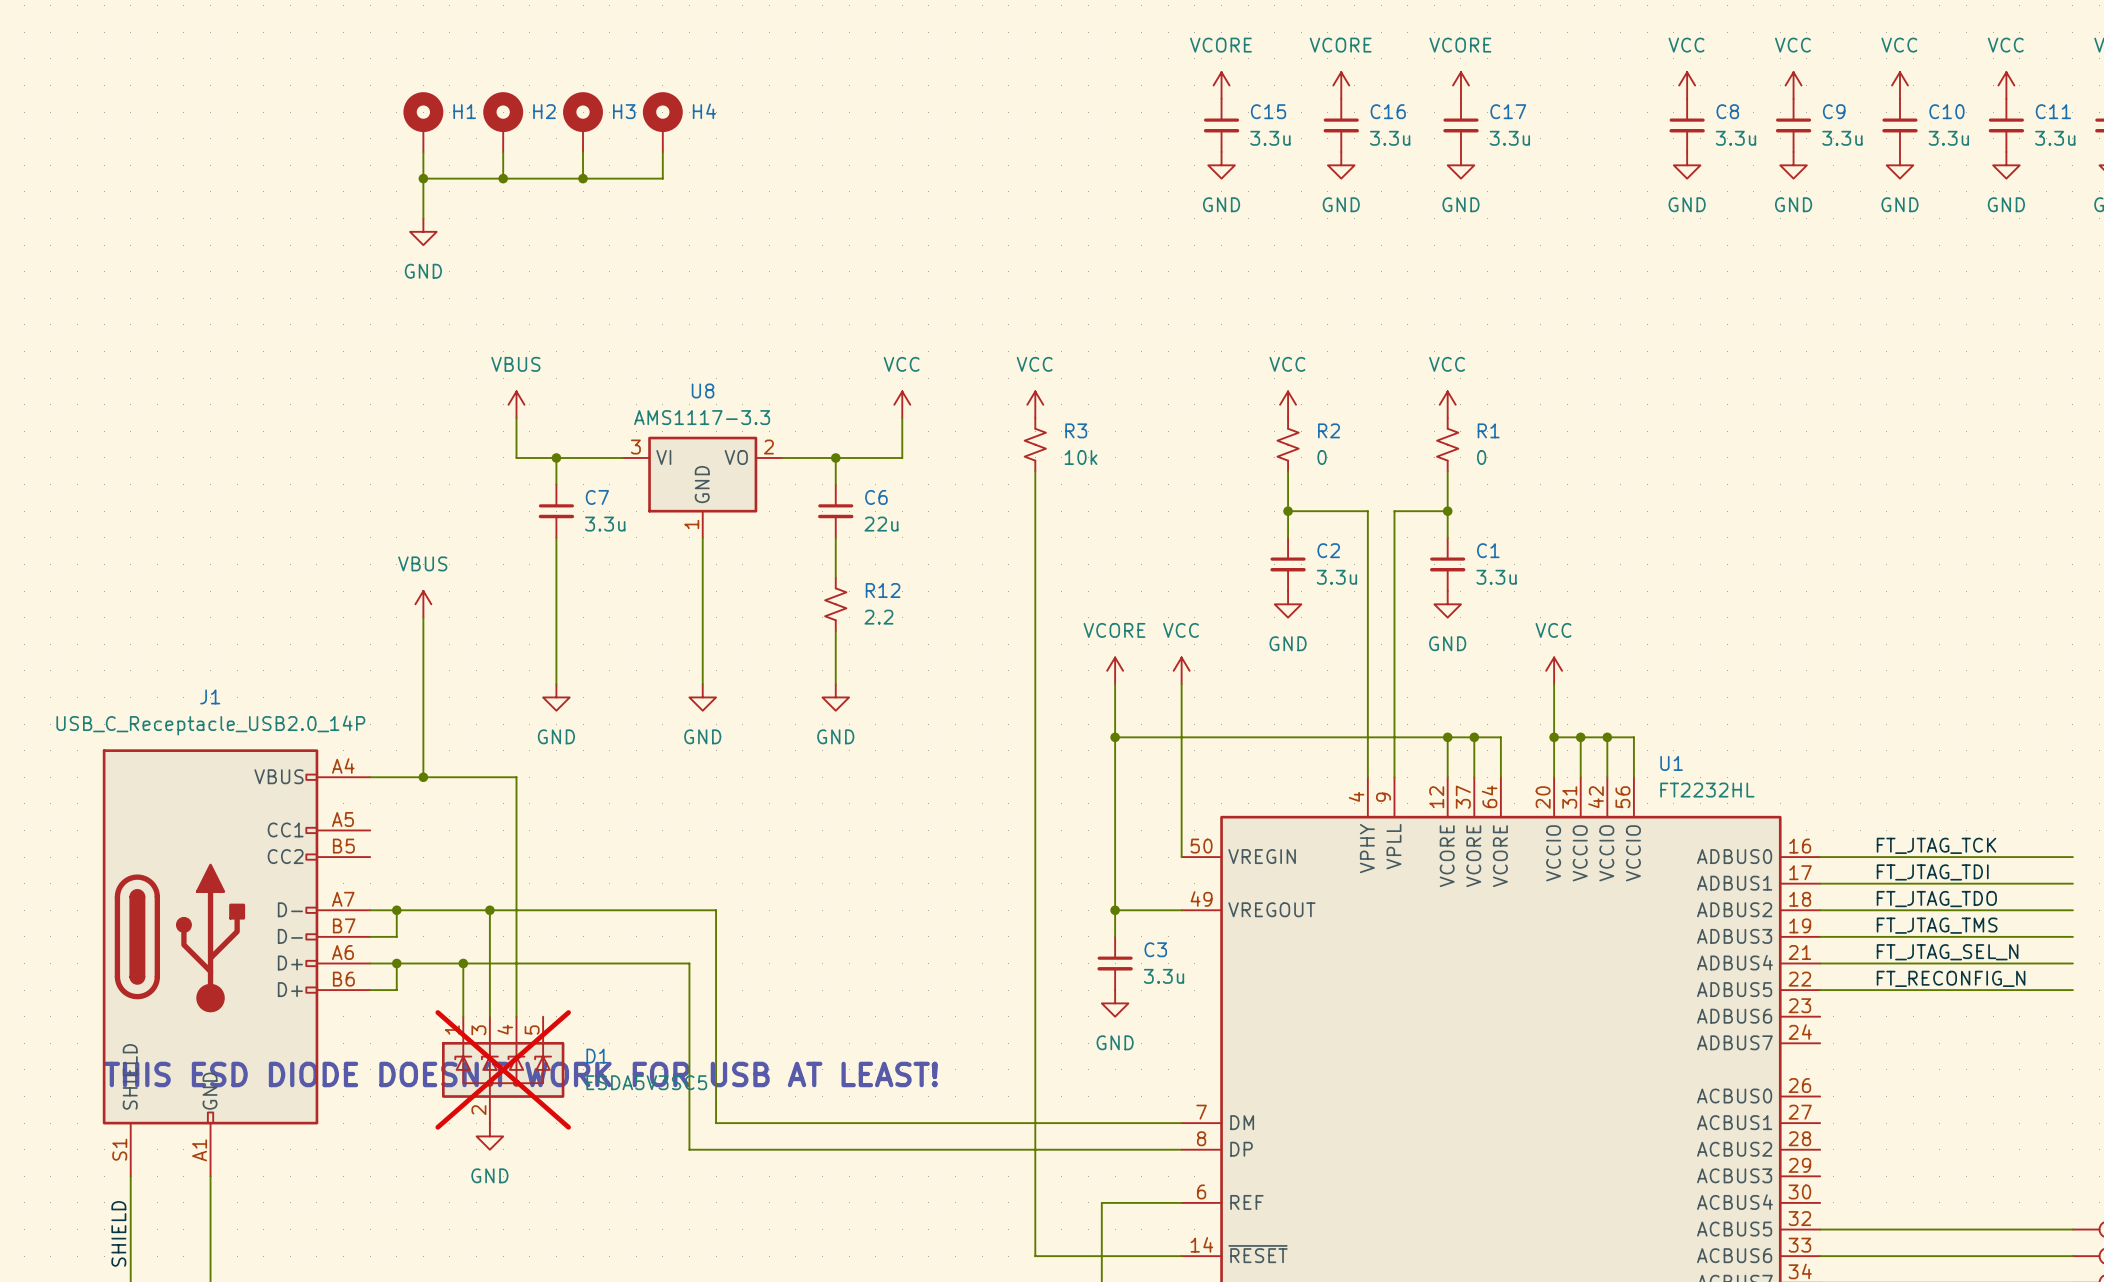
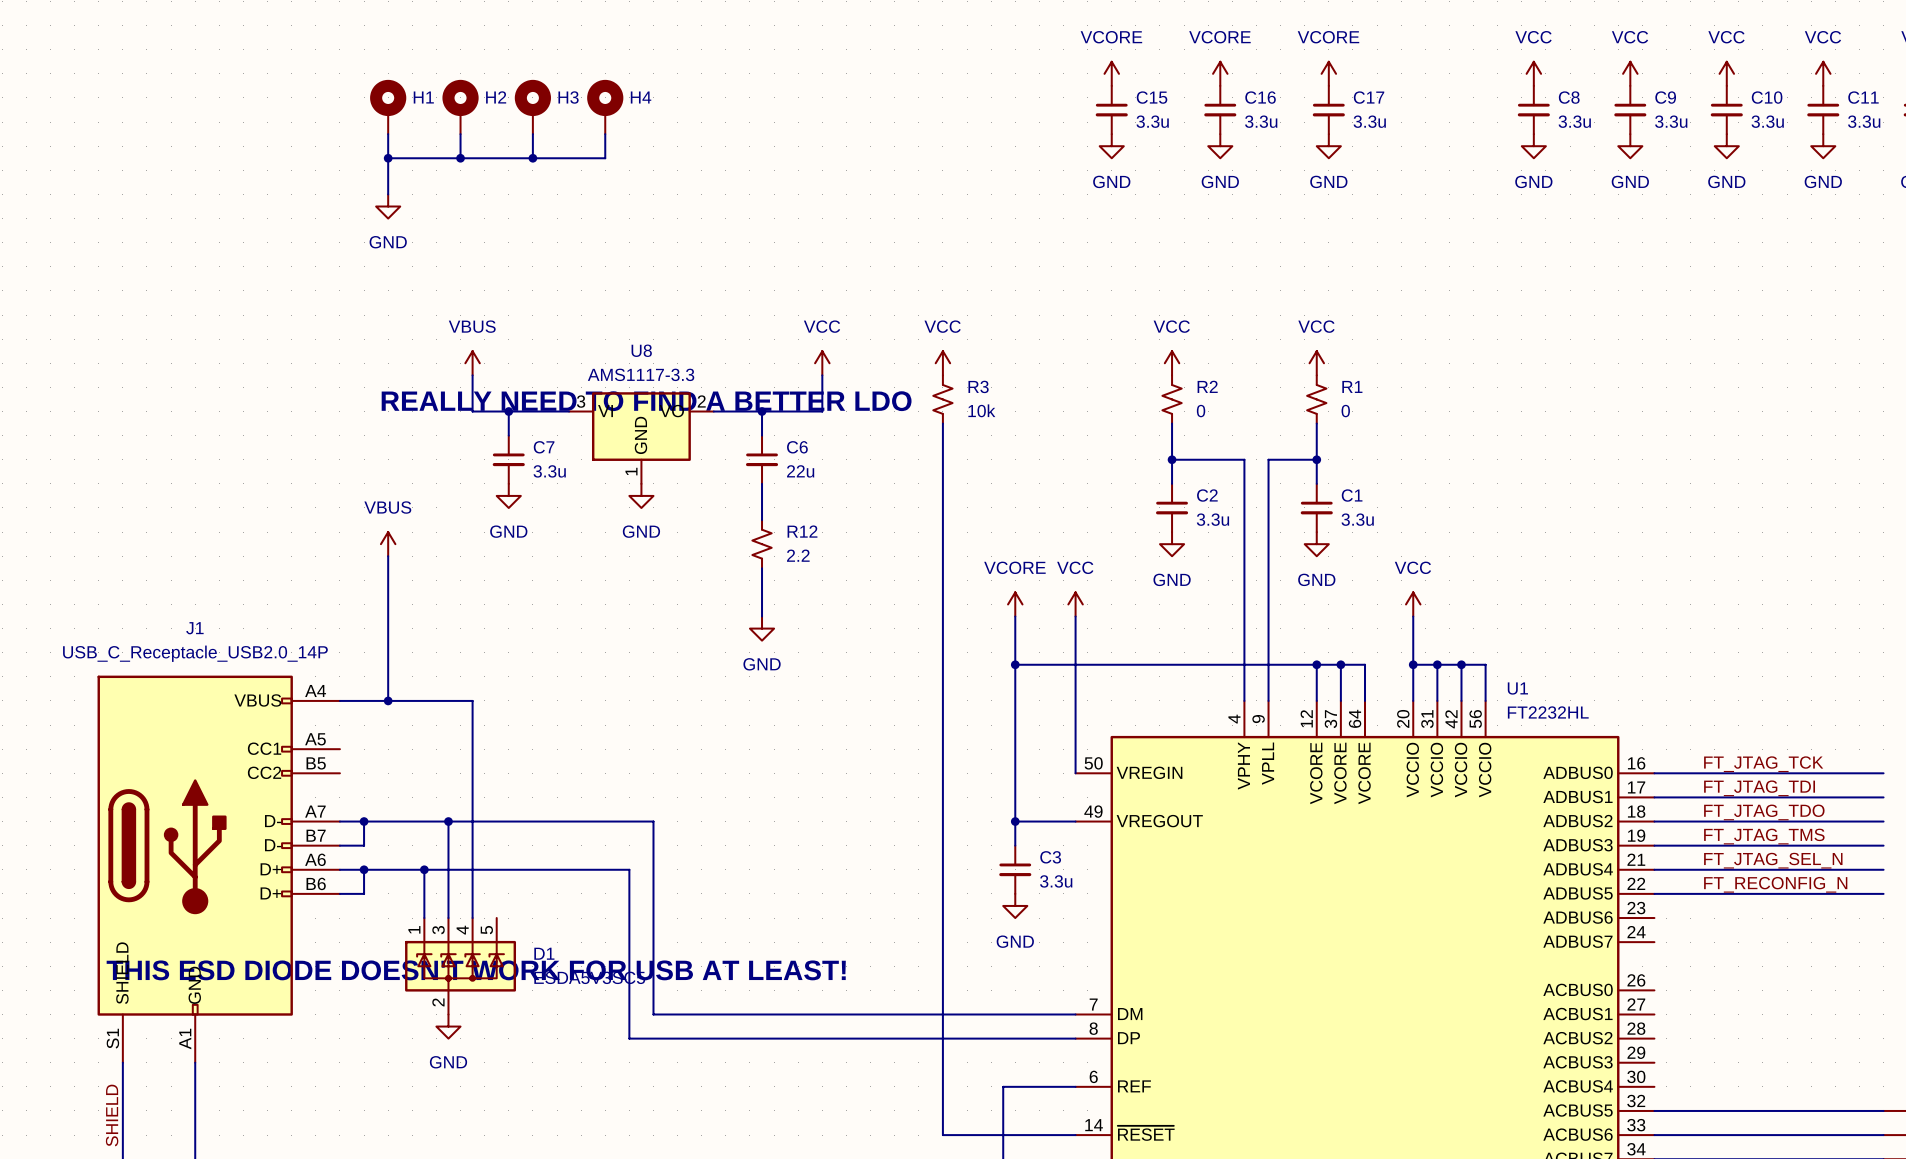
text: none -> REALLY NEED TO FIND A BETTER LDO (646, 401)
wire: (556, 537) (556, 684) -> none
wire: (702, 537) (702, 684) -> none
power symbol: none -> GND (508, 495)
power symbol: none -> GND (641, 495)
power symbol: GND (556, 697) -> none
power symbol: GND (702, 697) -> none
D1 do-not-place cross: (503, 1069) -> none

